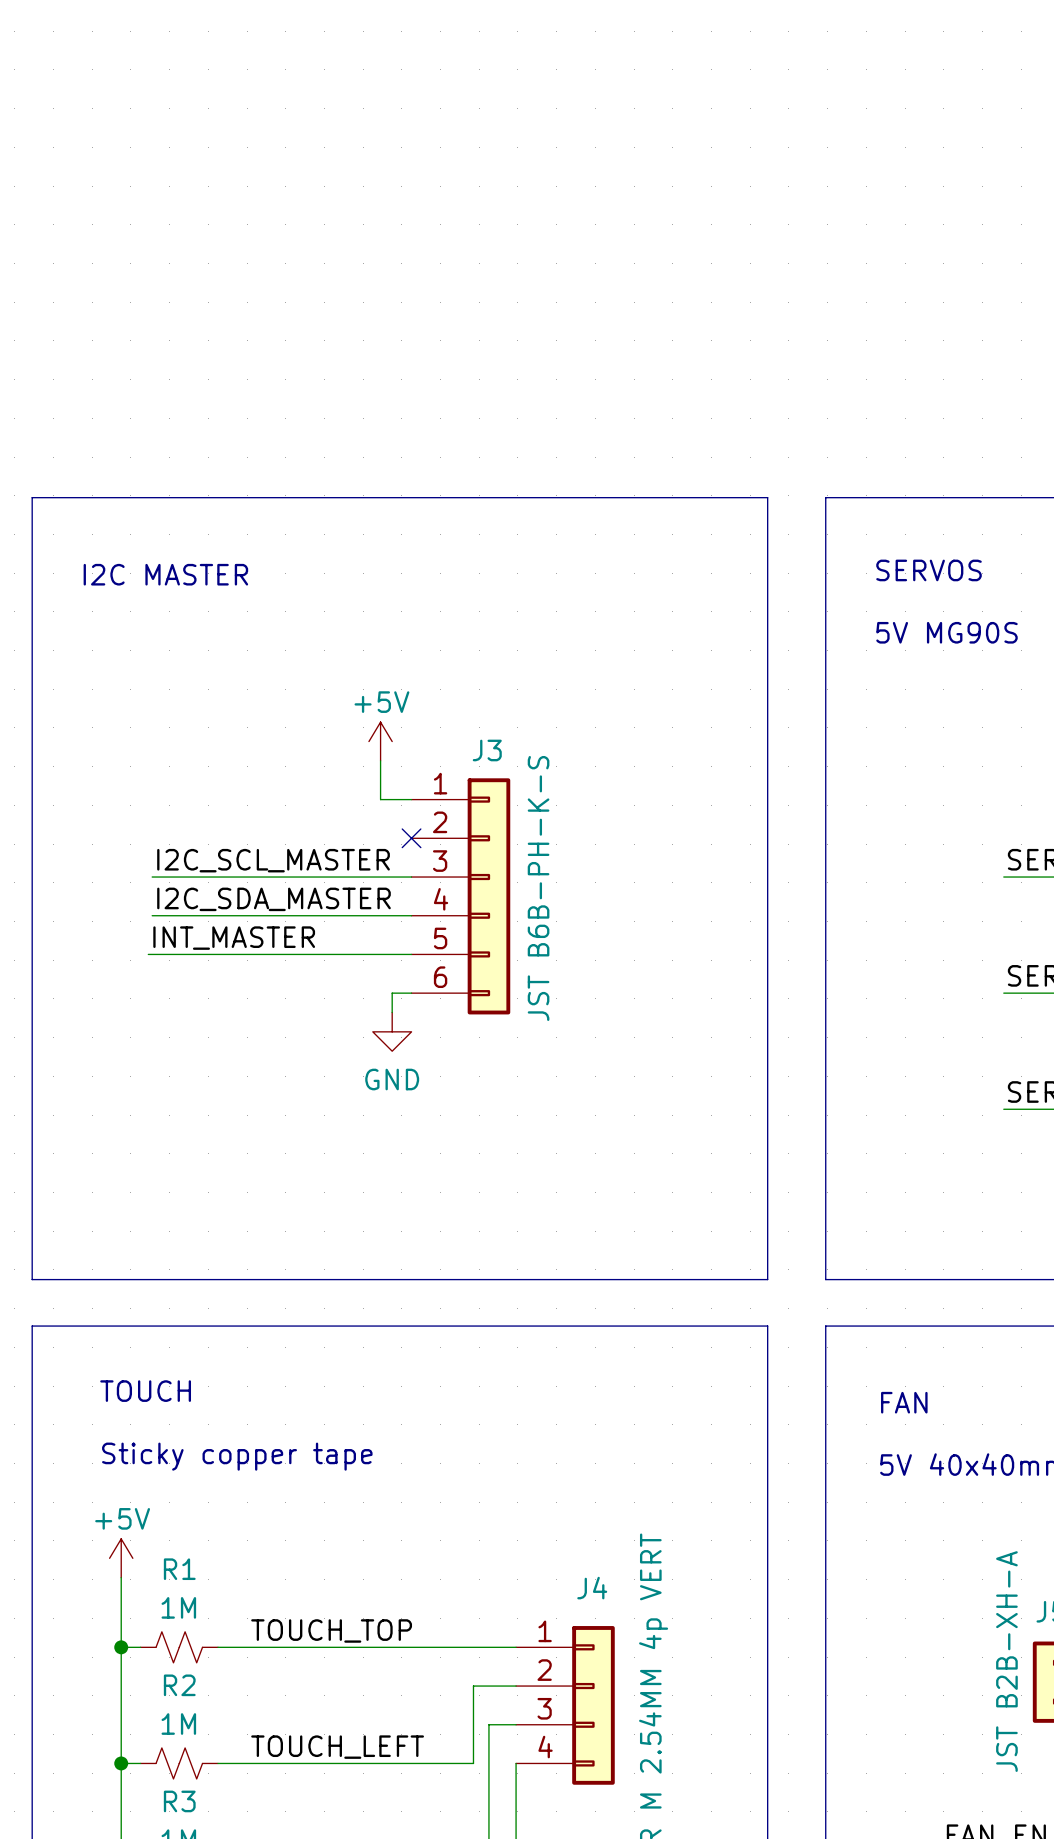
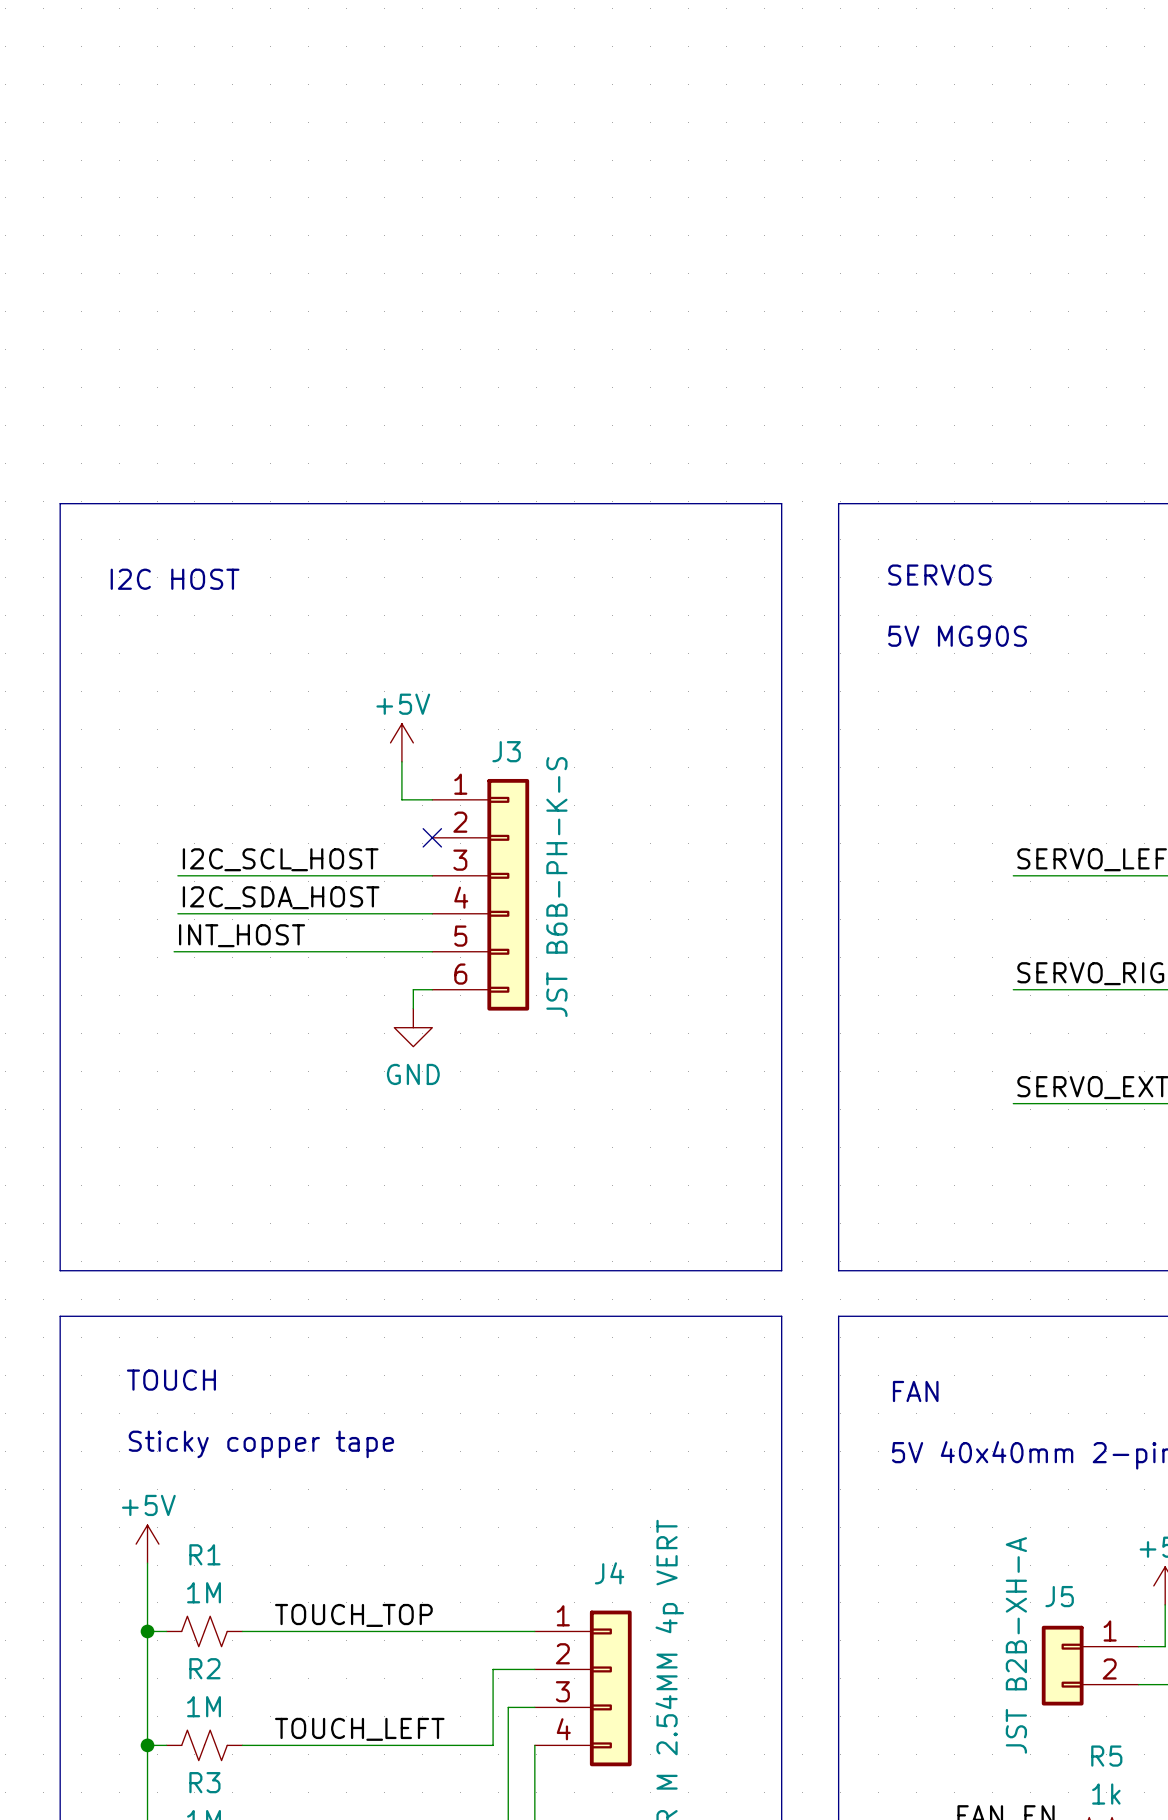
text: I2C MASTER (165, 574) -> I2C HOST (175, 579)
label: I2C_SCL_MASTER (273, 860) -> I2C_SCL_HOST (280, 859)
label: I2C_SDA_MASTER (273, 899) -> I2C_SDA_HOST (281, 897)
label: INT_MASTER (234, 938) -> INT_HOST (242, 935)

